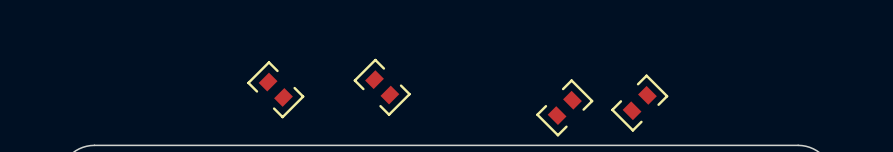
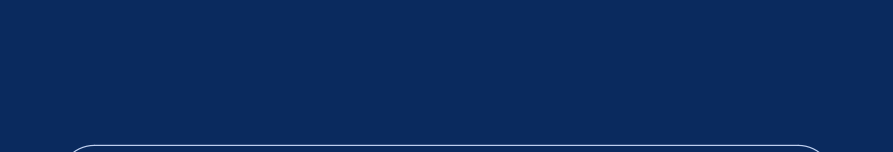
part: (382, 87) -> none
part: (275, 89) -> none
part: (639, 103) -> none
part: (564, 107) -> none

